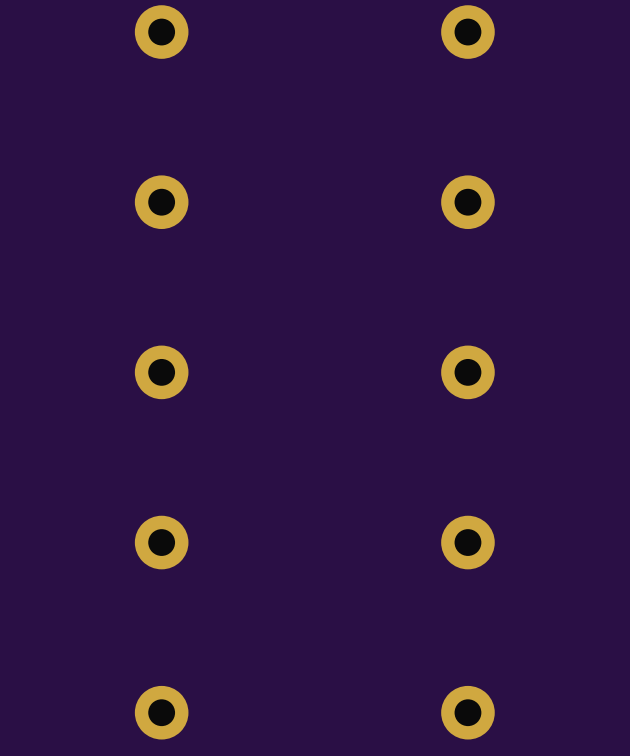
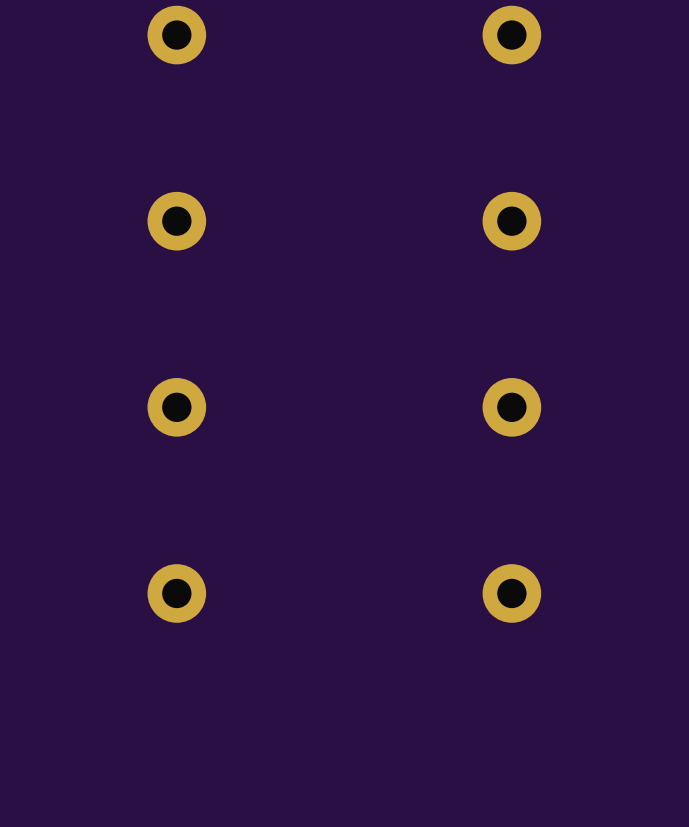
via: (161, 712) -> none
via: (467, 712) -> none

